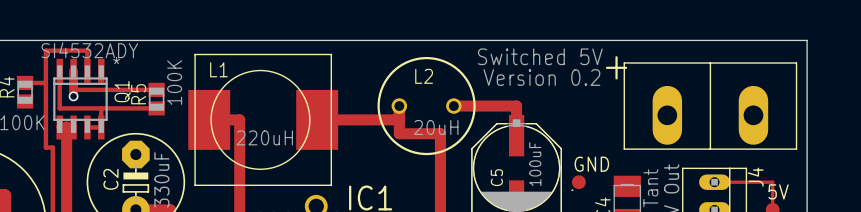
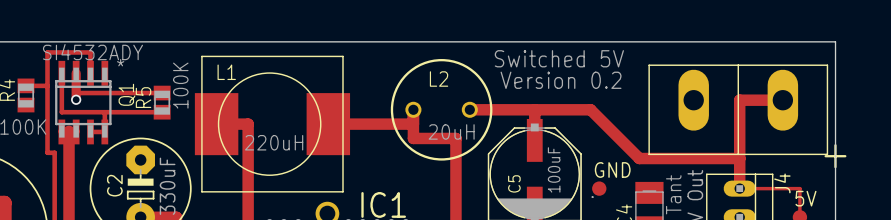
part footprint: [623, 62, 798, 150] -> [648, 64, 829, 156]
track: none -> (782, 100) (739, 100) (739, 188)
track: none -> (534, 109) (590, 109) (639, 158) (739, 158)

